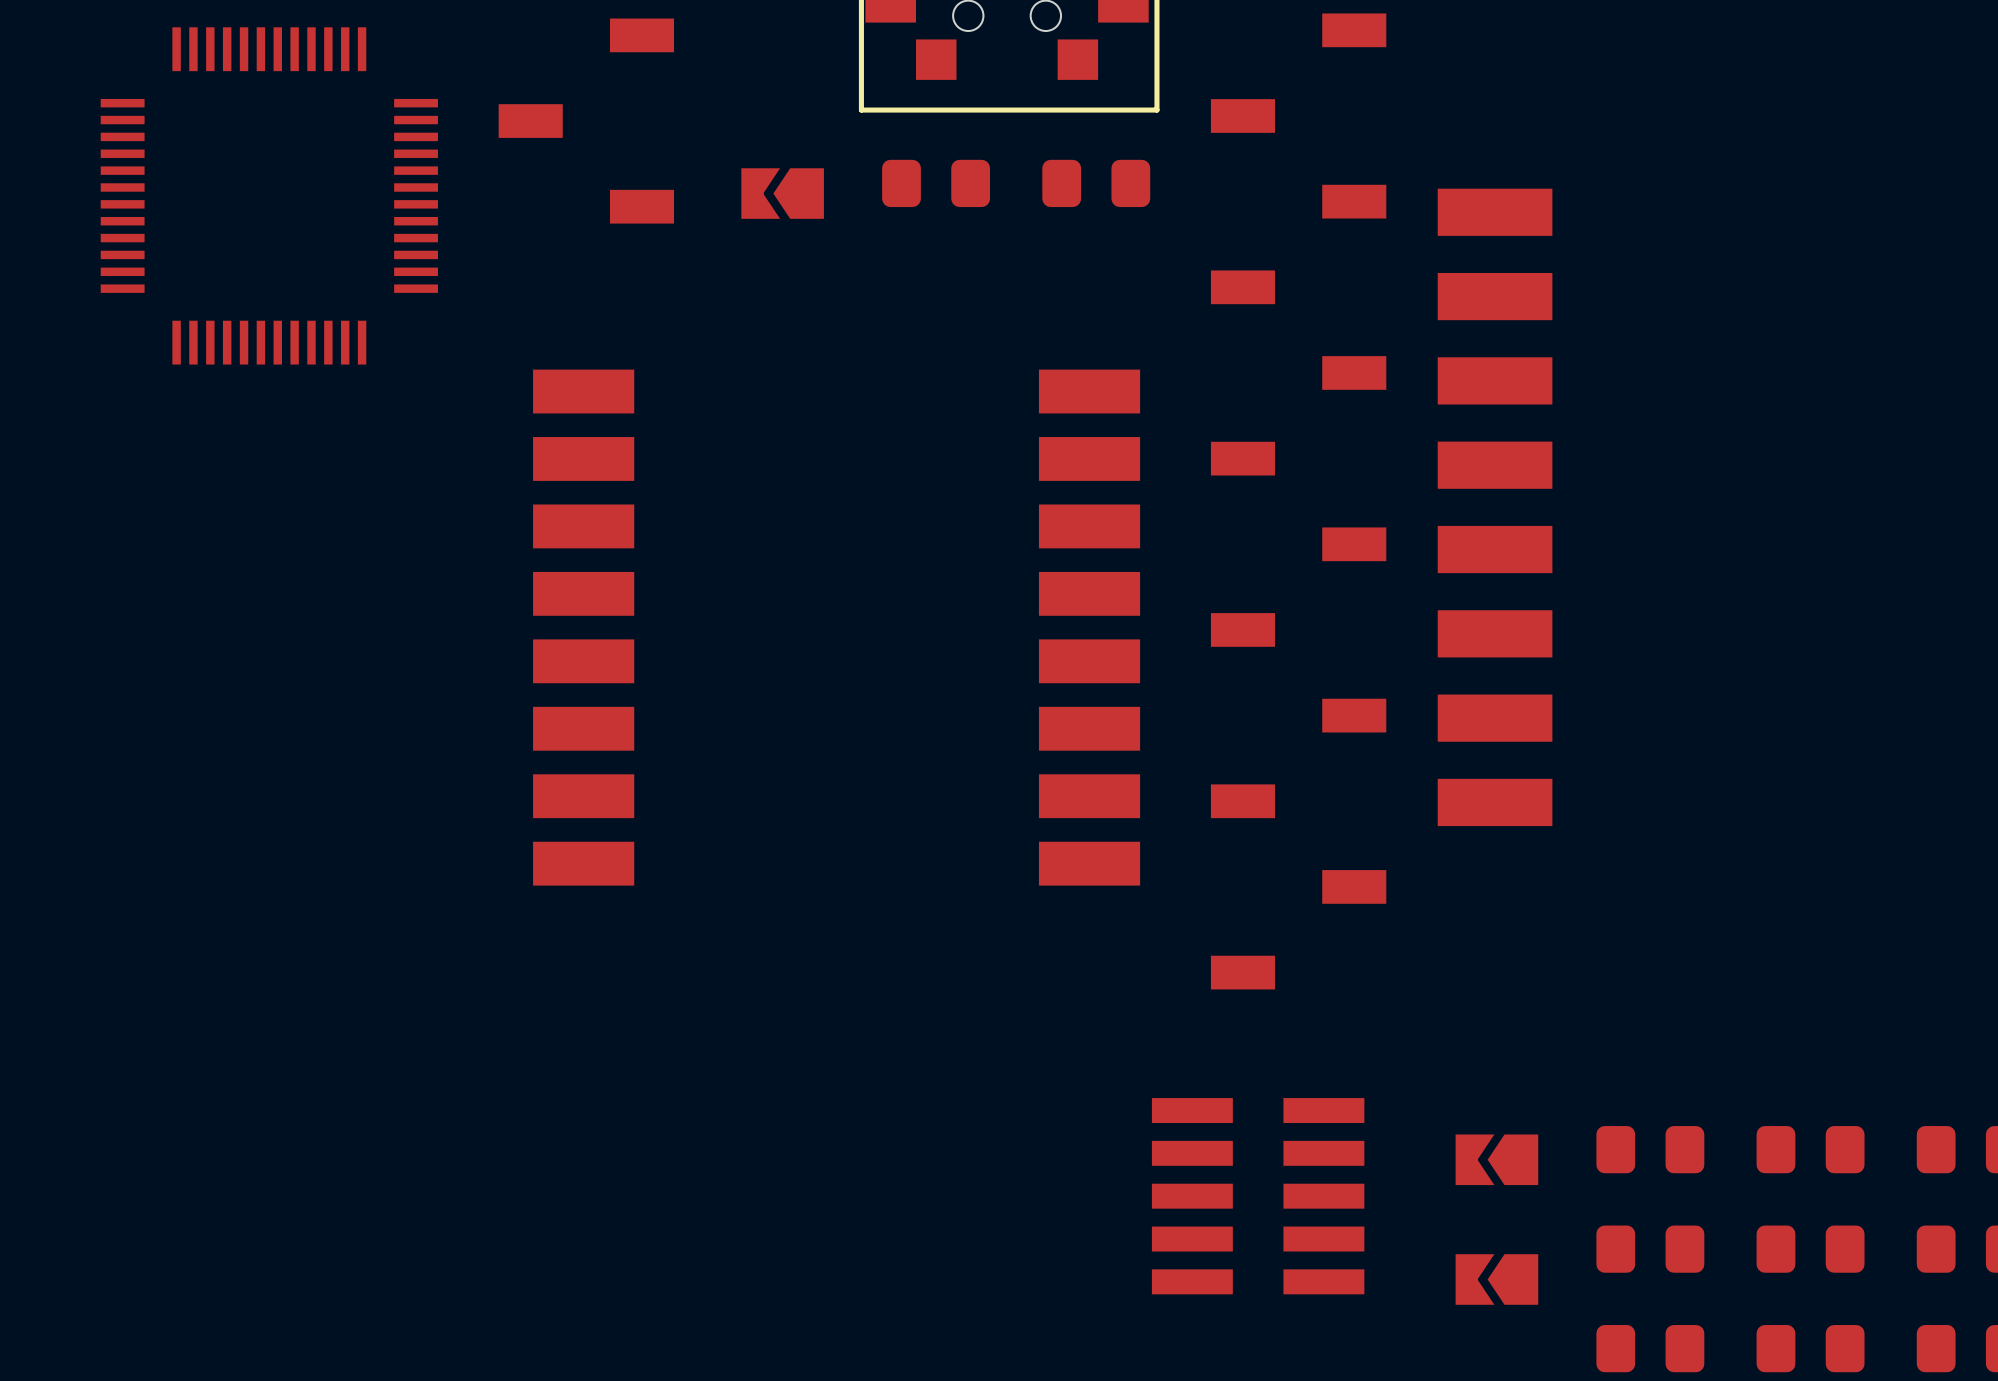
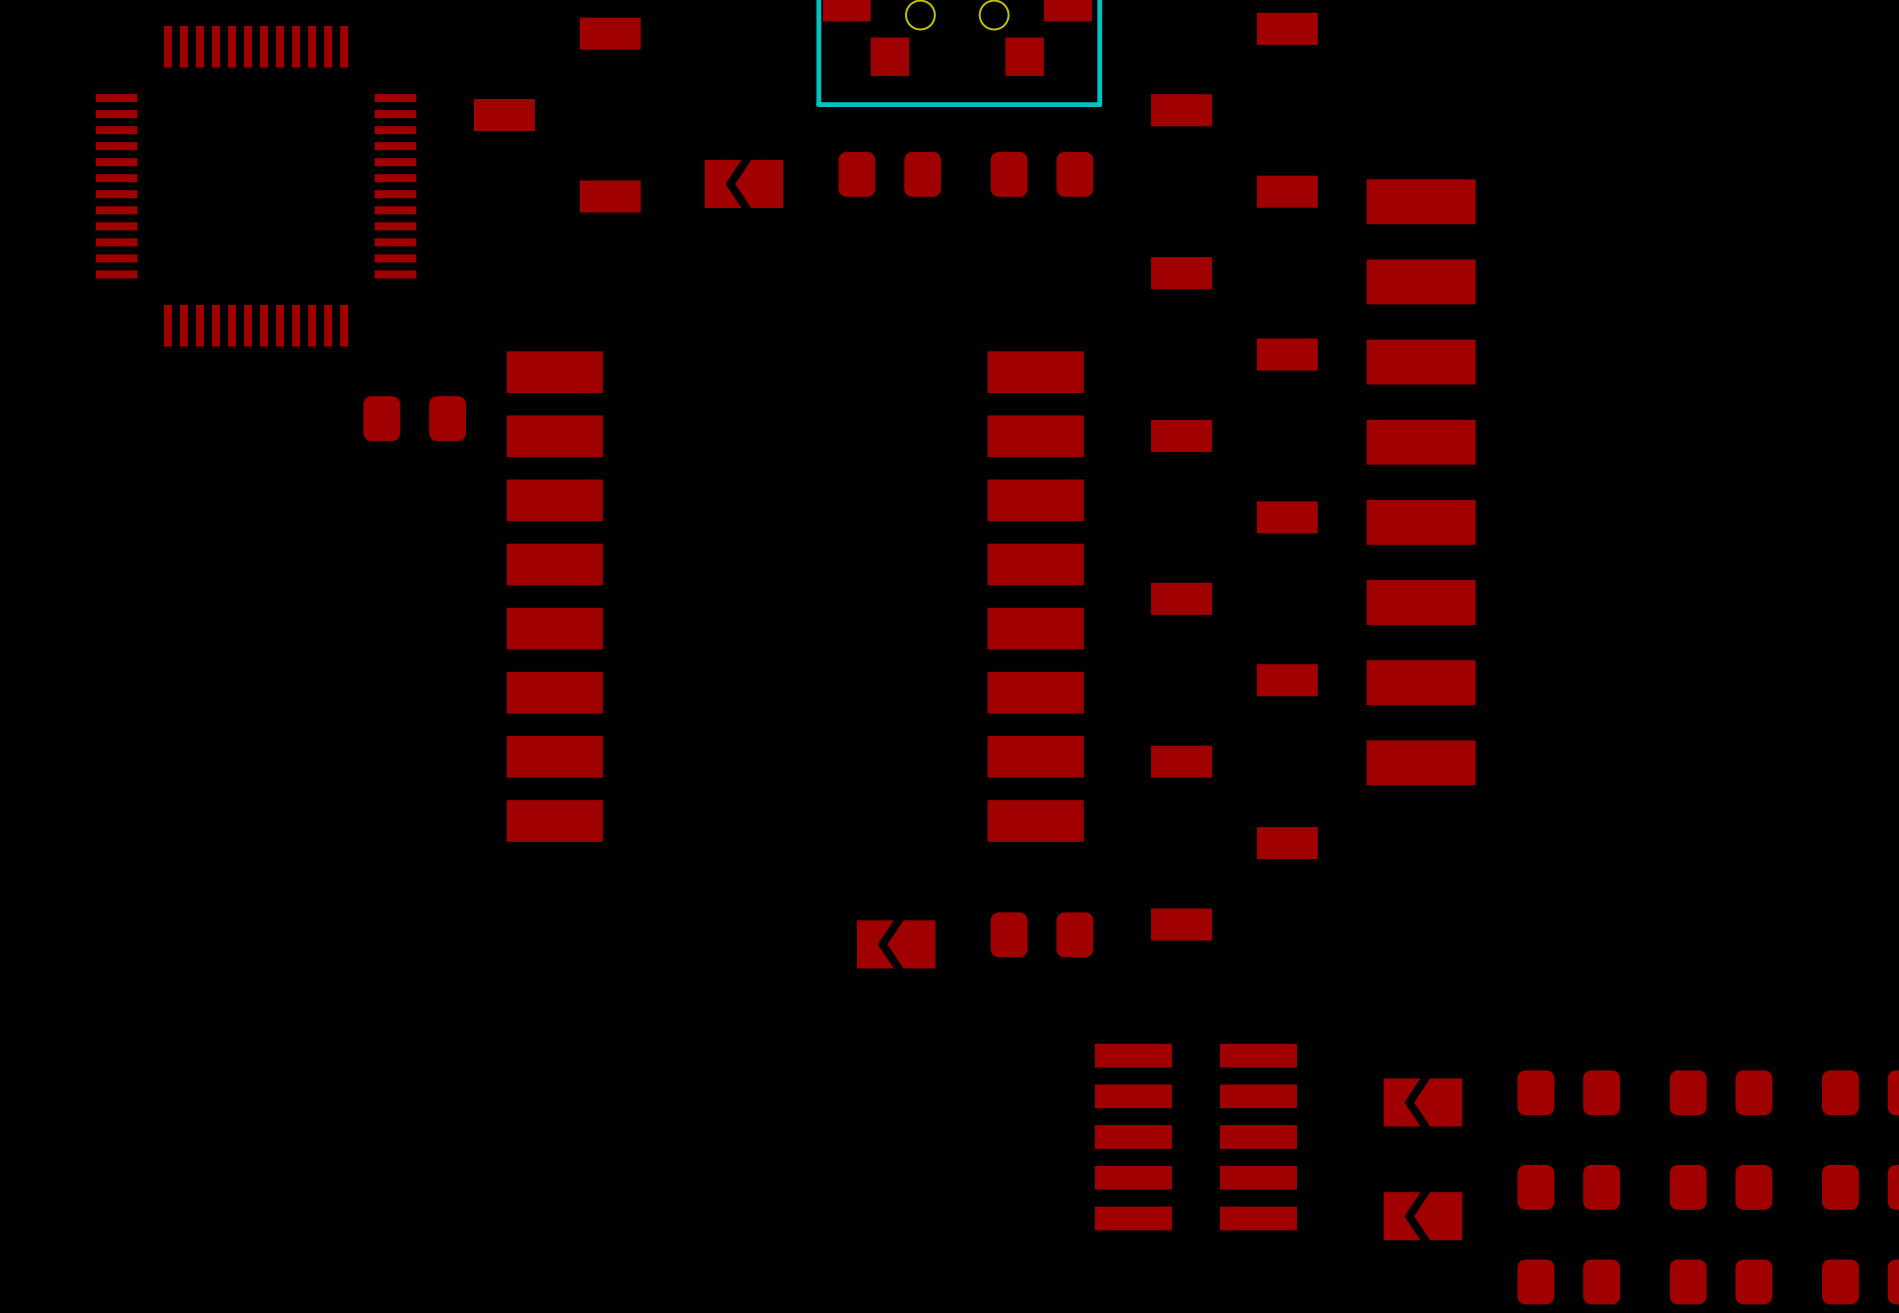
part: none -> (414, 418)
part: none -> (1042, 934)
part: none -> (896, 944)

